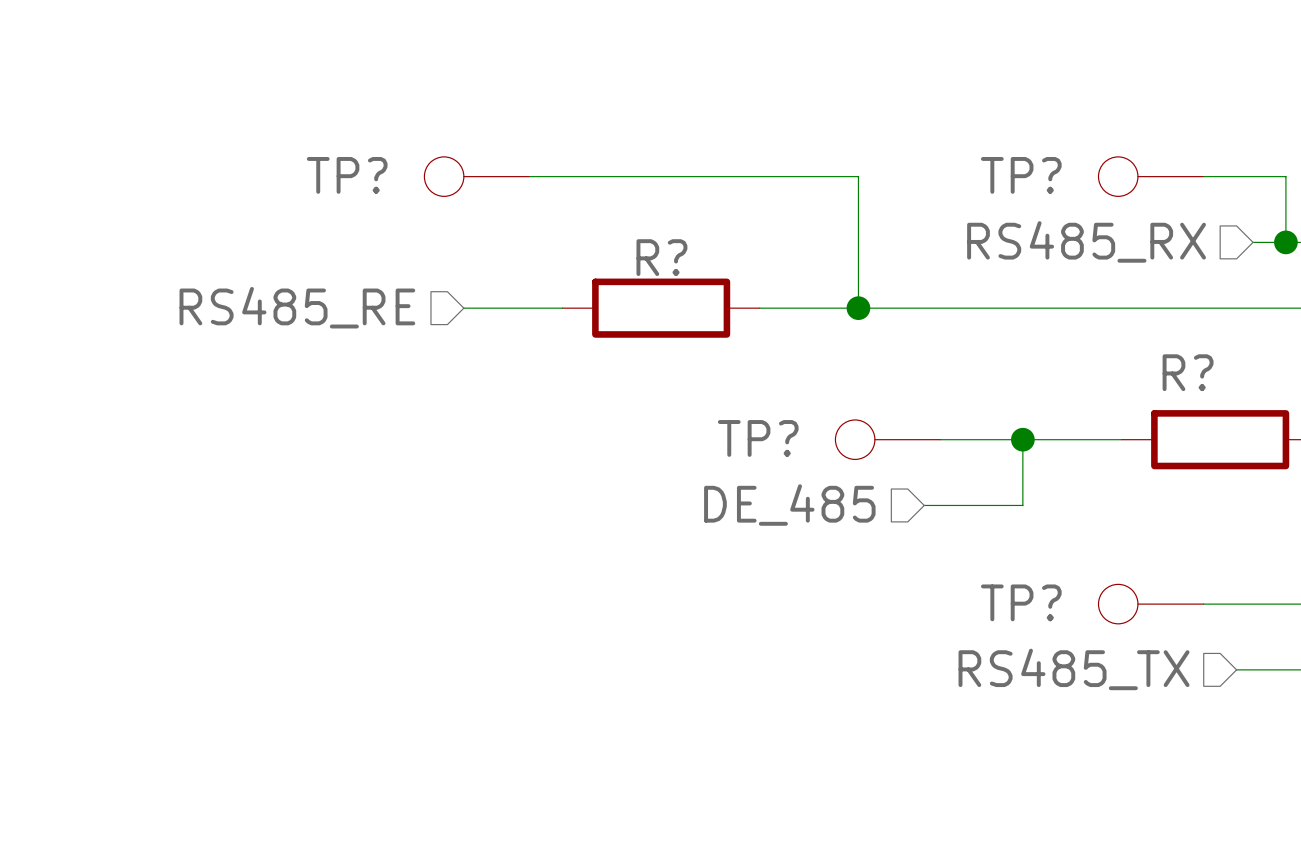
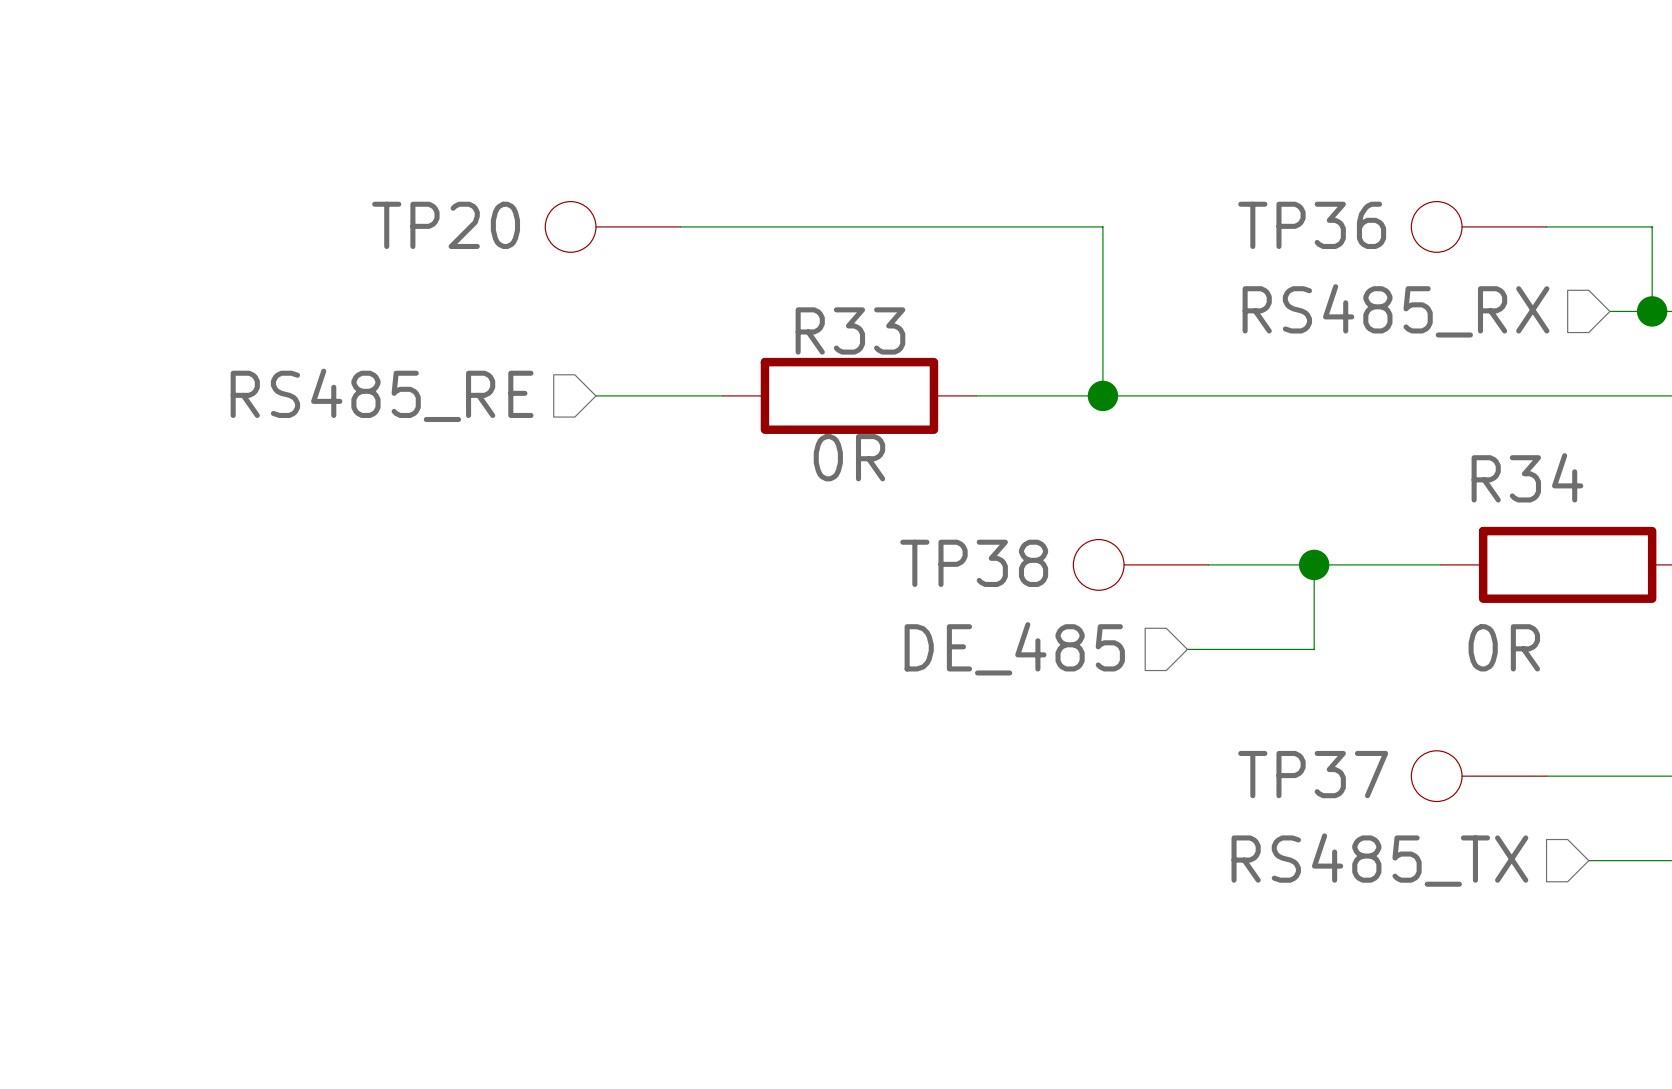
TP? name: TP? (347, 175) -> TP20 (446, 225)
TP? name: TP? (1021, 175) -> TP36 (1312, 225)
R? name: R? (661, 257) -> R33 (850, 330)
R? value: none -> 0R (849, 457)
R? name: R? (1188, 372) -> R34 (1527, 477)
TP? name: TP? (758, 438) -> TP38 (974, 563)
R? value: none -> 0R (1504, 647)
TP? name: TP? (1021, 602) -> TP37 (1313, 774)

